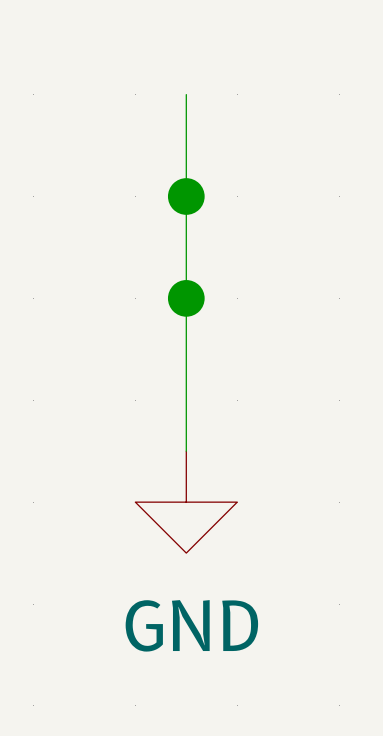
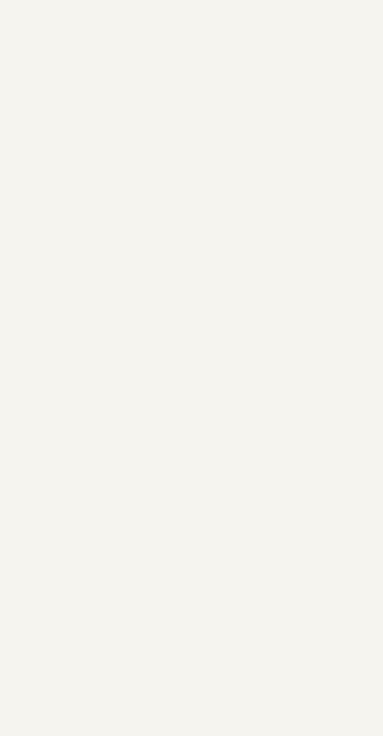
wire: (186, 94) (186, 451) -> none
junction: (186, 196) -> none
junction: (186, 298) -> none
power symbol: GND (186, 502) -> none

